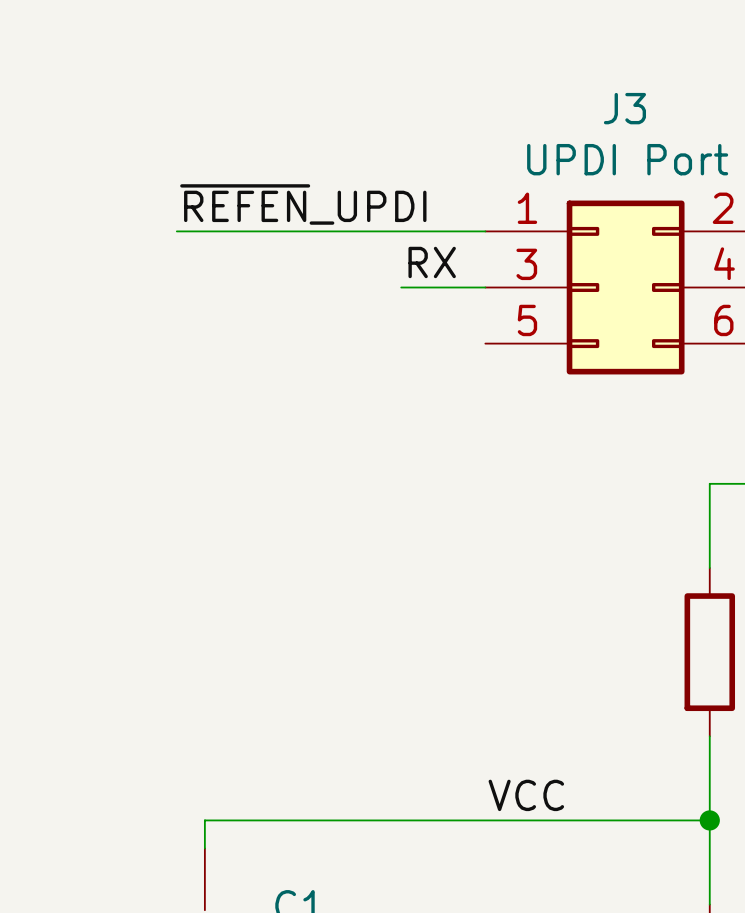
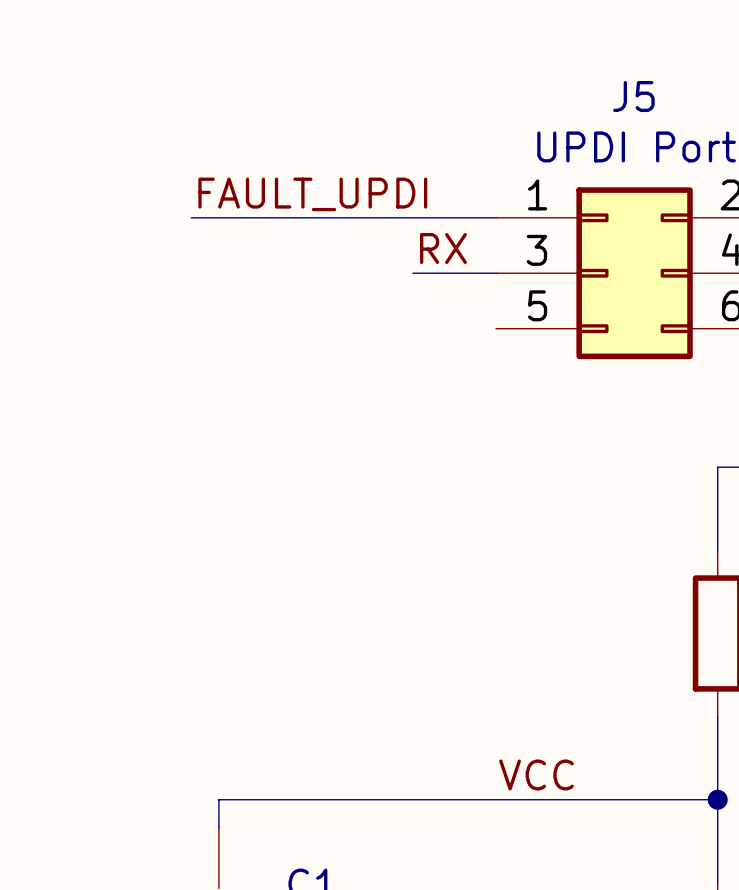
J3 name: J3 (624, 108) -> J5 (633, 96)
label: ~{REFEN}_UPDI (303, 204) -> FAULT_UPDI (312, 194)

